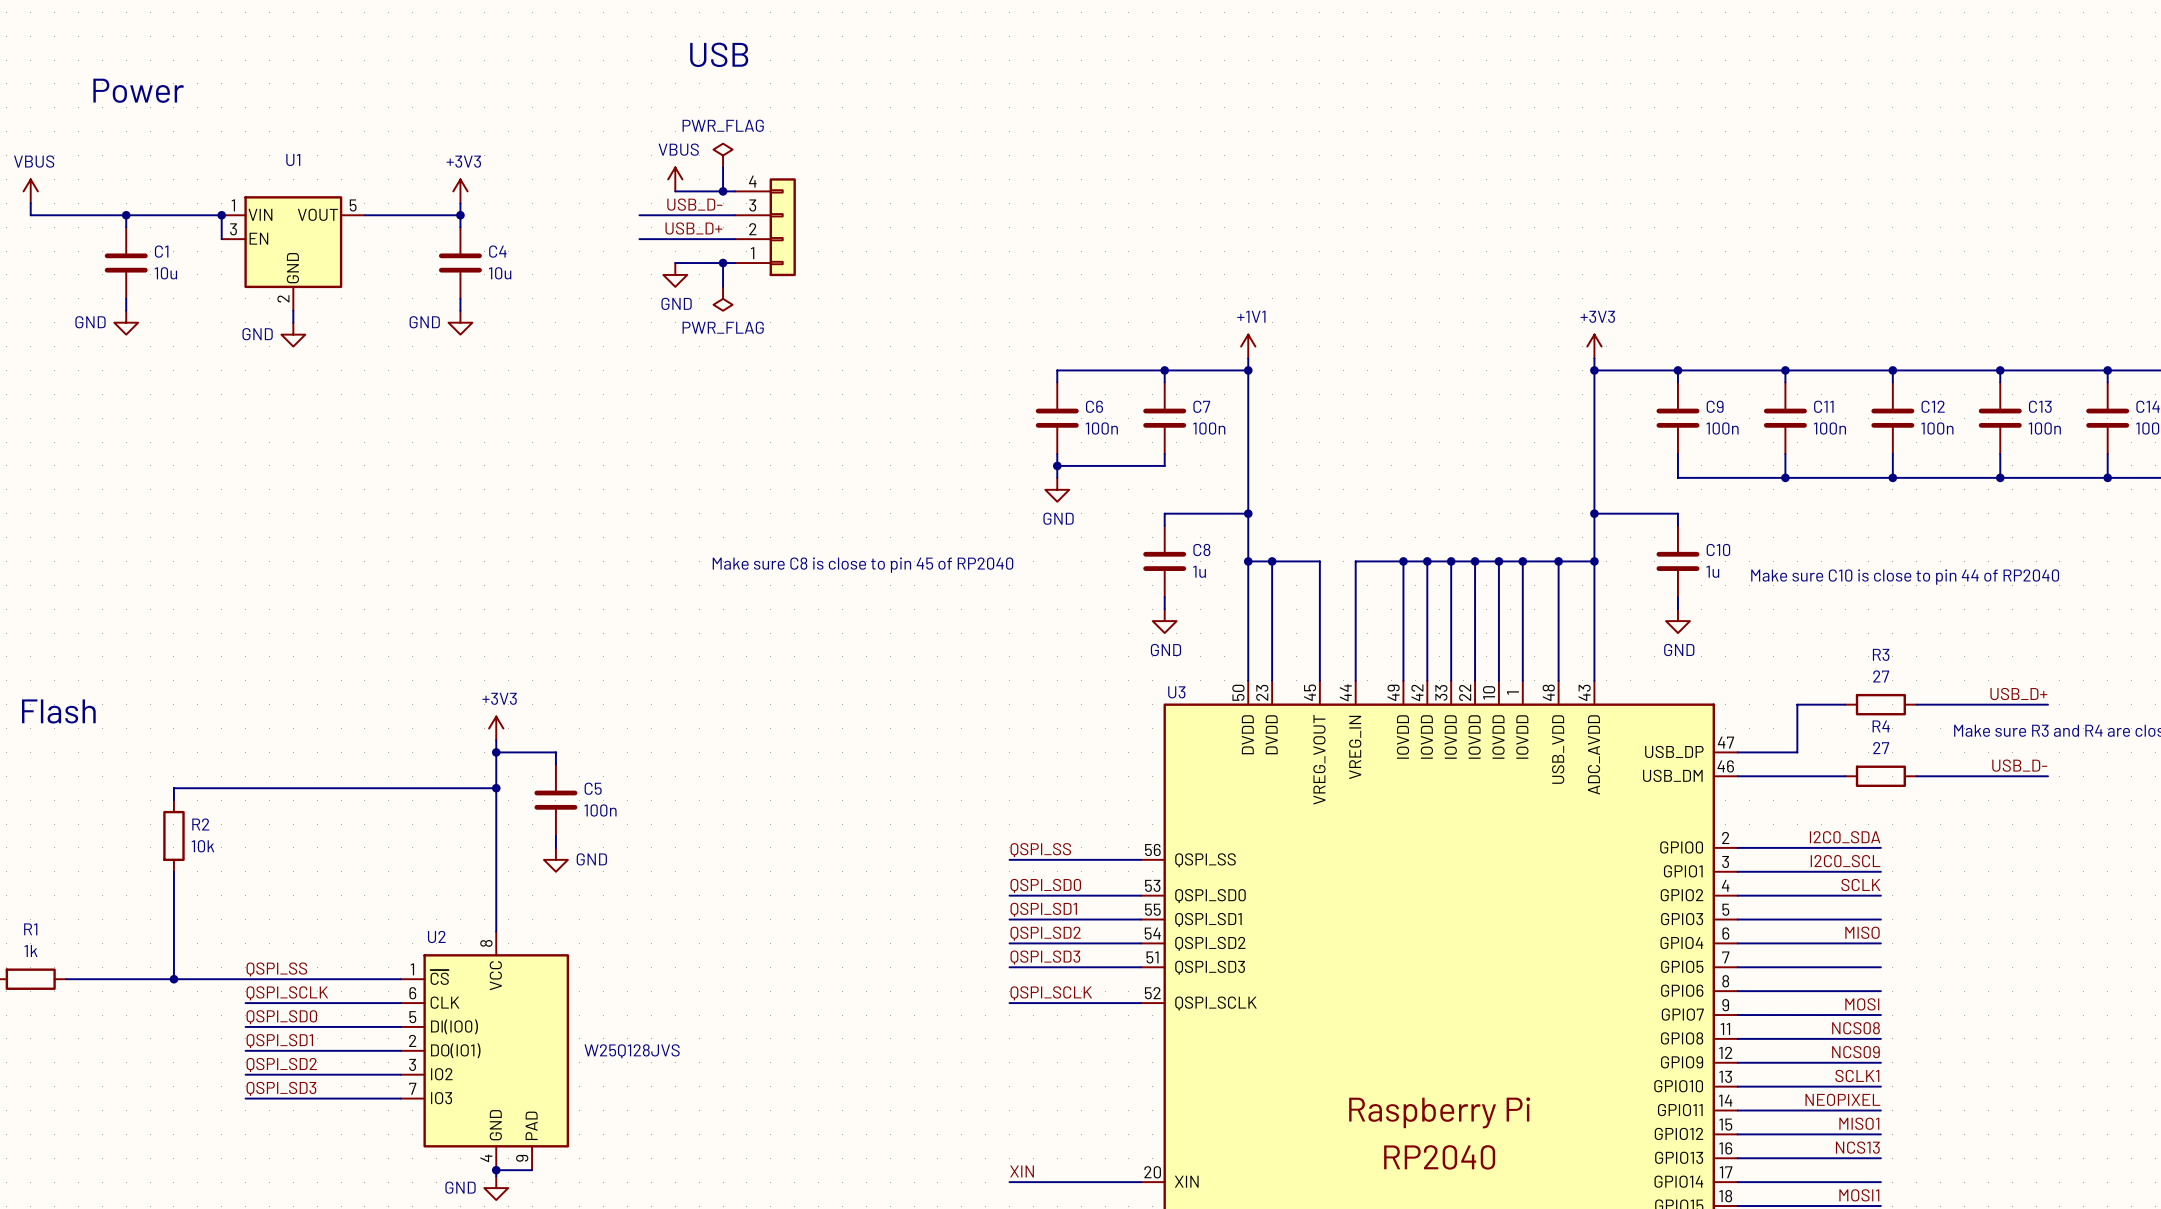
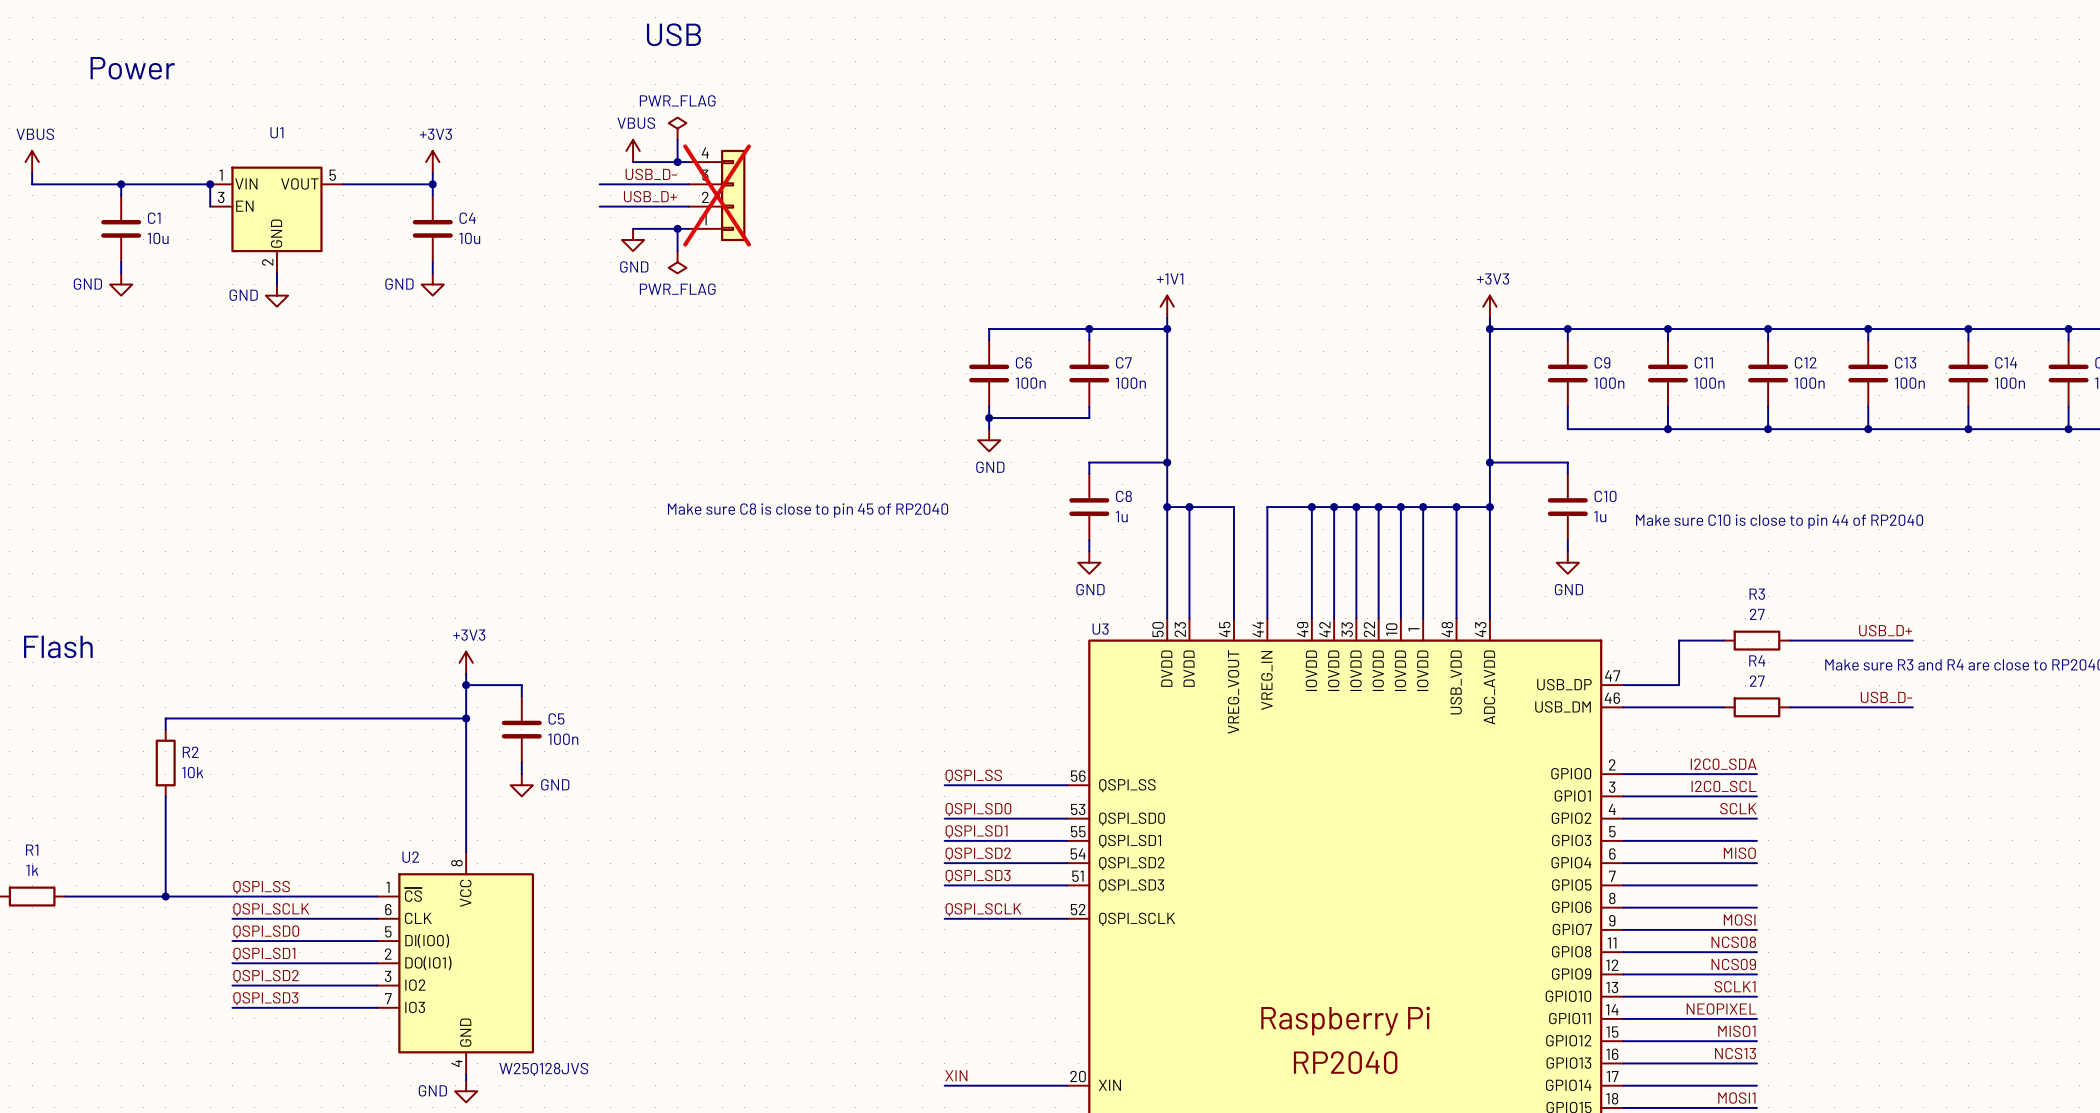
part do-not-place cross: none -> (717, 195)
U2 symbol: [400, 931, 570, 1171] -> [377, 852, 535, 1075]
U2 value position: W25Q128JVS (632, 1051) -> W25Q128JVS (543, 1069)
wire: (496, 1170) (532, 1170) -> none
junction: (496, 1170) -> none

